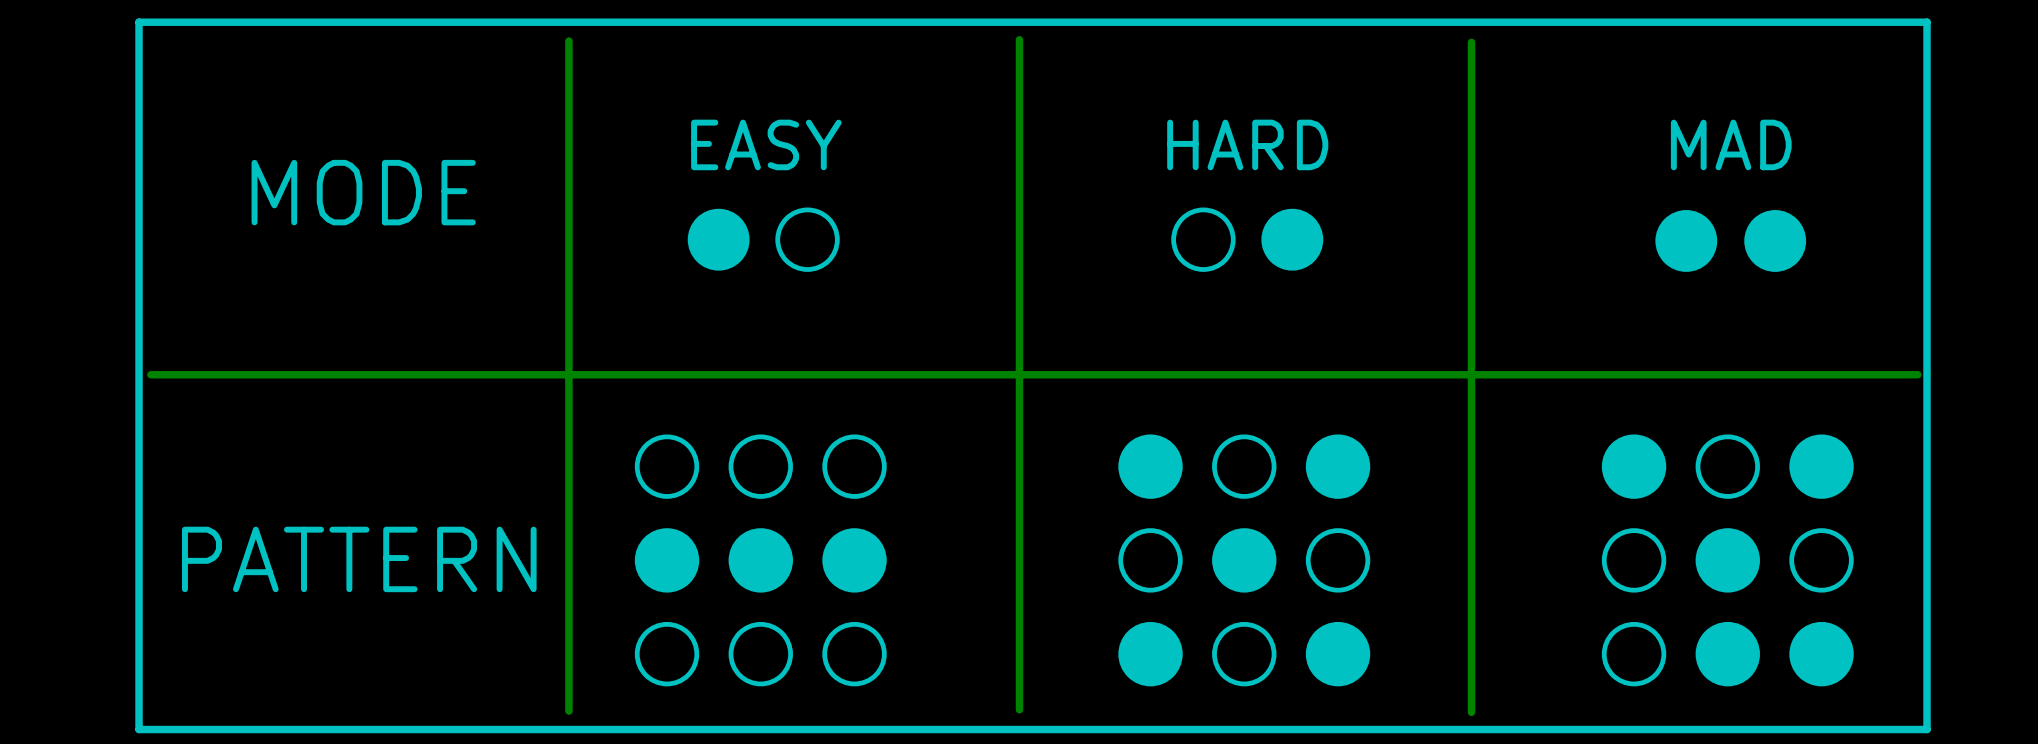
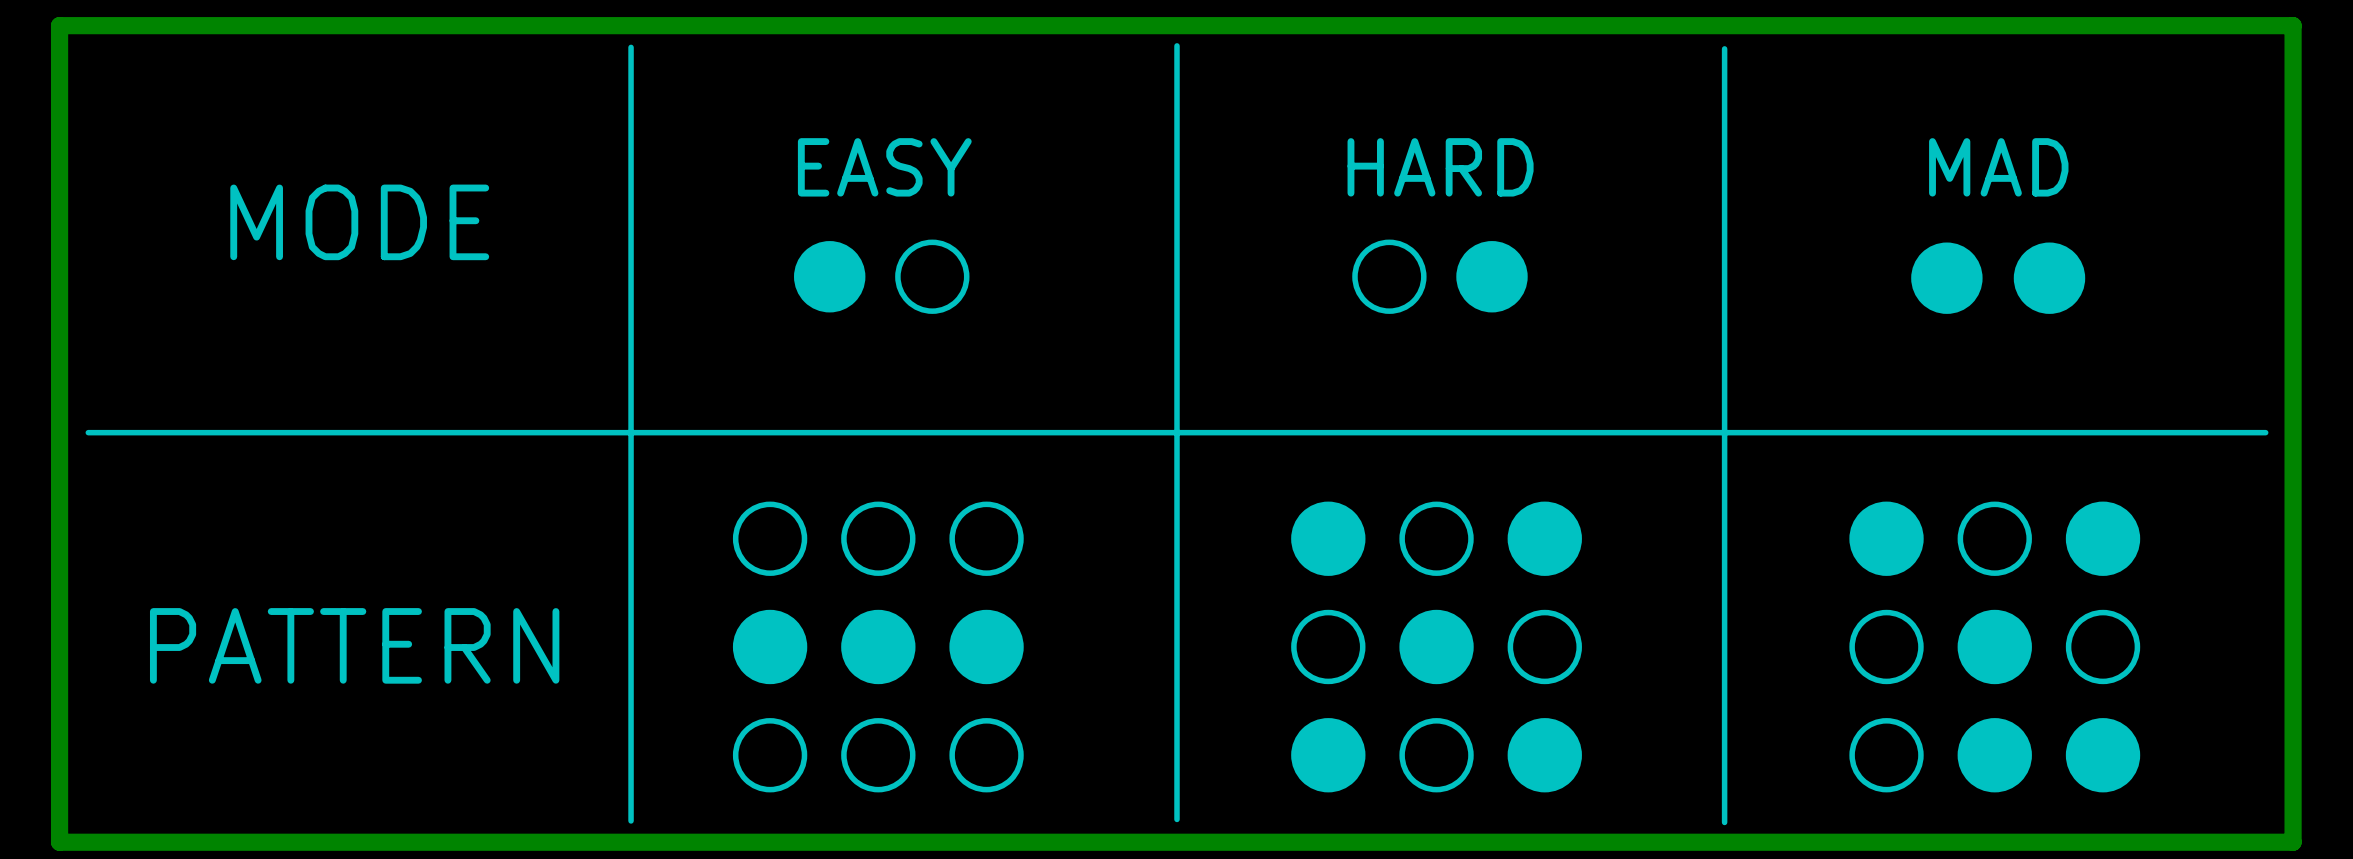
line: (1927, 22) (139, 22) (139, 729) (1927, 729) (1927, 22) -> none
bottom track: none -> (2293, 25) (59, 25) (59, 842) (2293, 842) (2293, 25)
bottom track: (1019, 39) (1019, 709) -> none
line: none -> (1177, 45) (1177, 819)
line: none -> (631, 47) (631, 820)
bottom track: (568, 41) (568, 711) -> none
bottom track: (1471, 42) (1471, 712) -> none
line: none -> (1724, 48) (1724, 822)
text position: MODE (363, 192) -> MODE (359, 222)
bottom track: (1917, 374) (150, 374) -> none
line: none -> (2265, 432) (88, 432)
text position: PATTERN (359, 559) -> PATTERN (354, 645)

